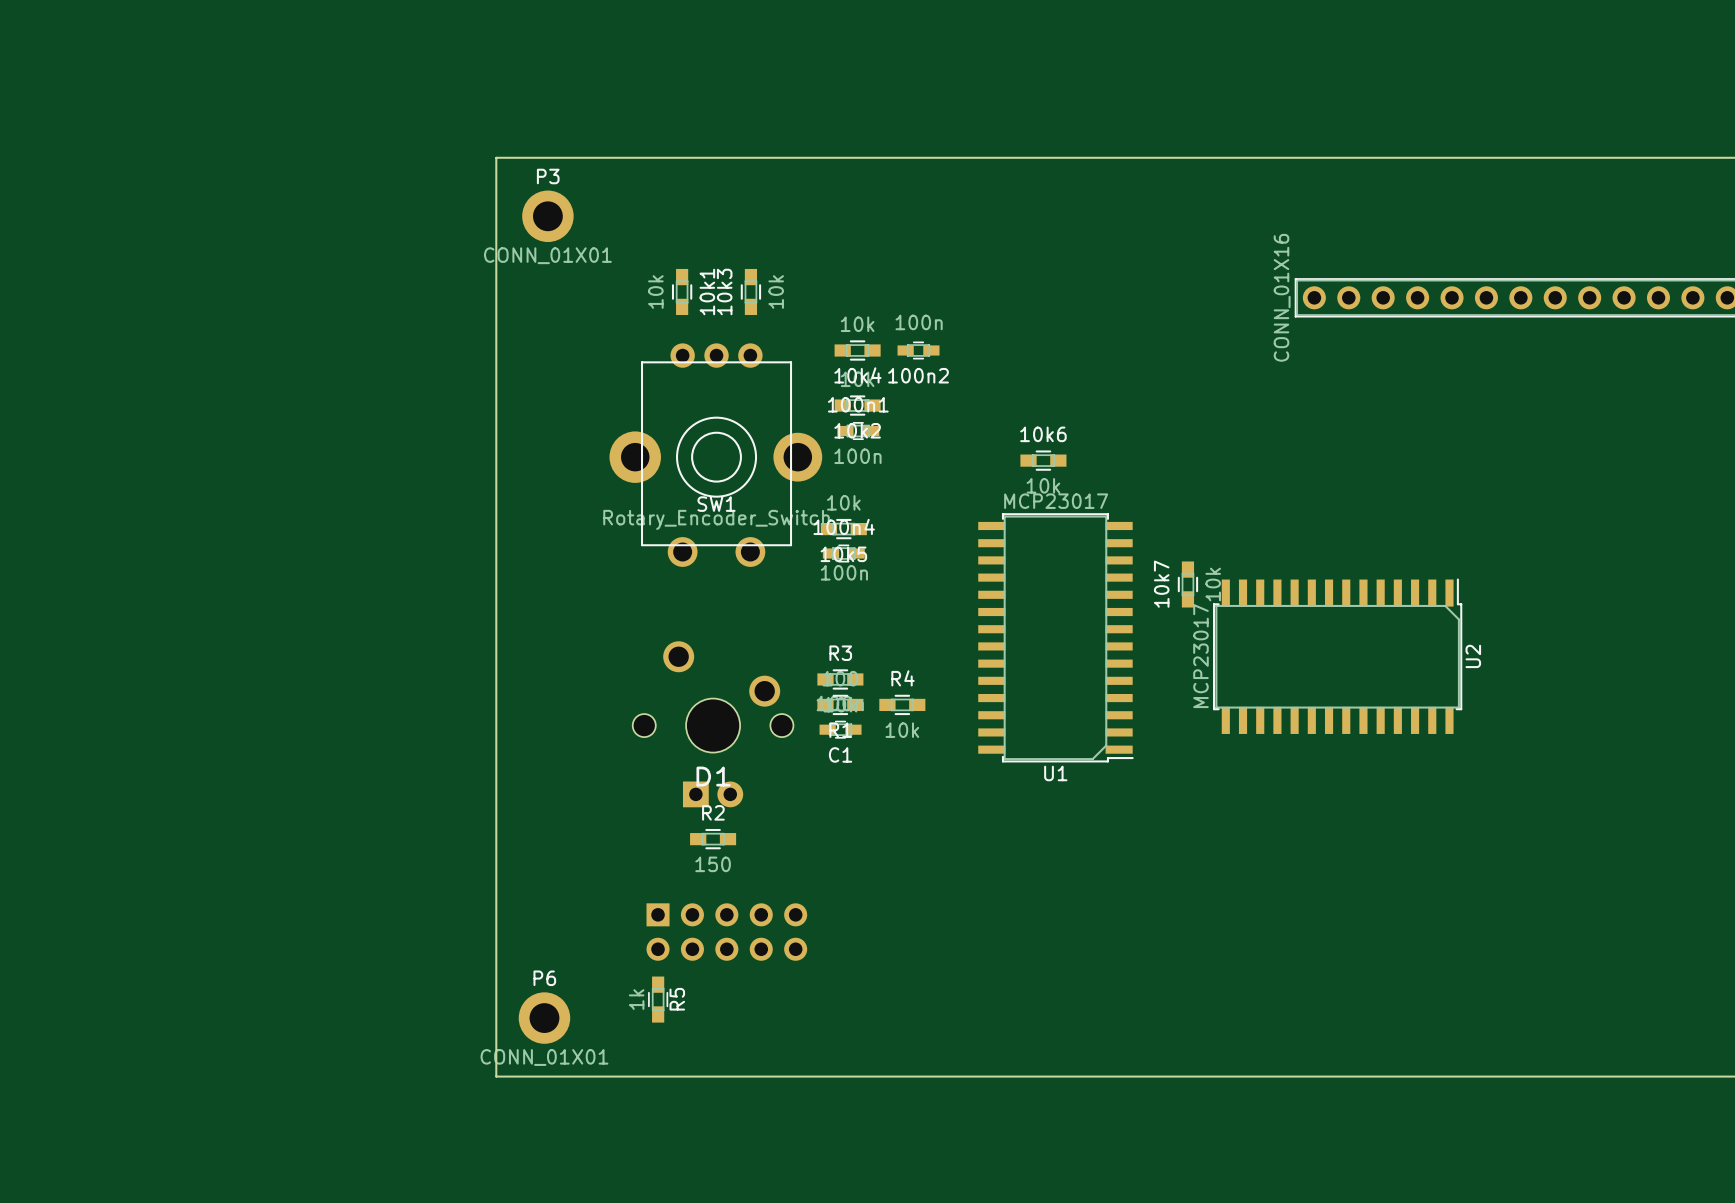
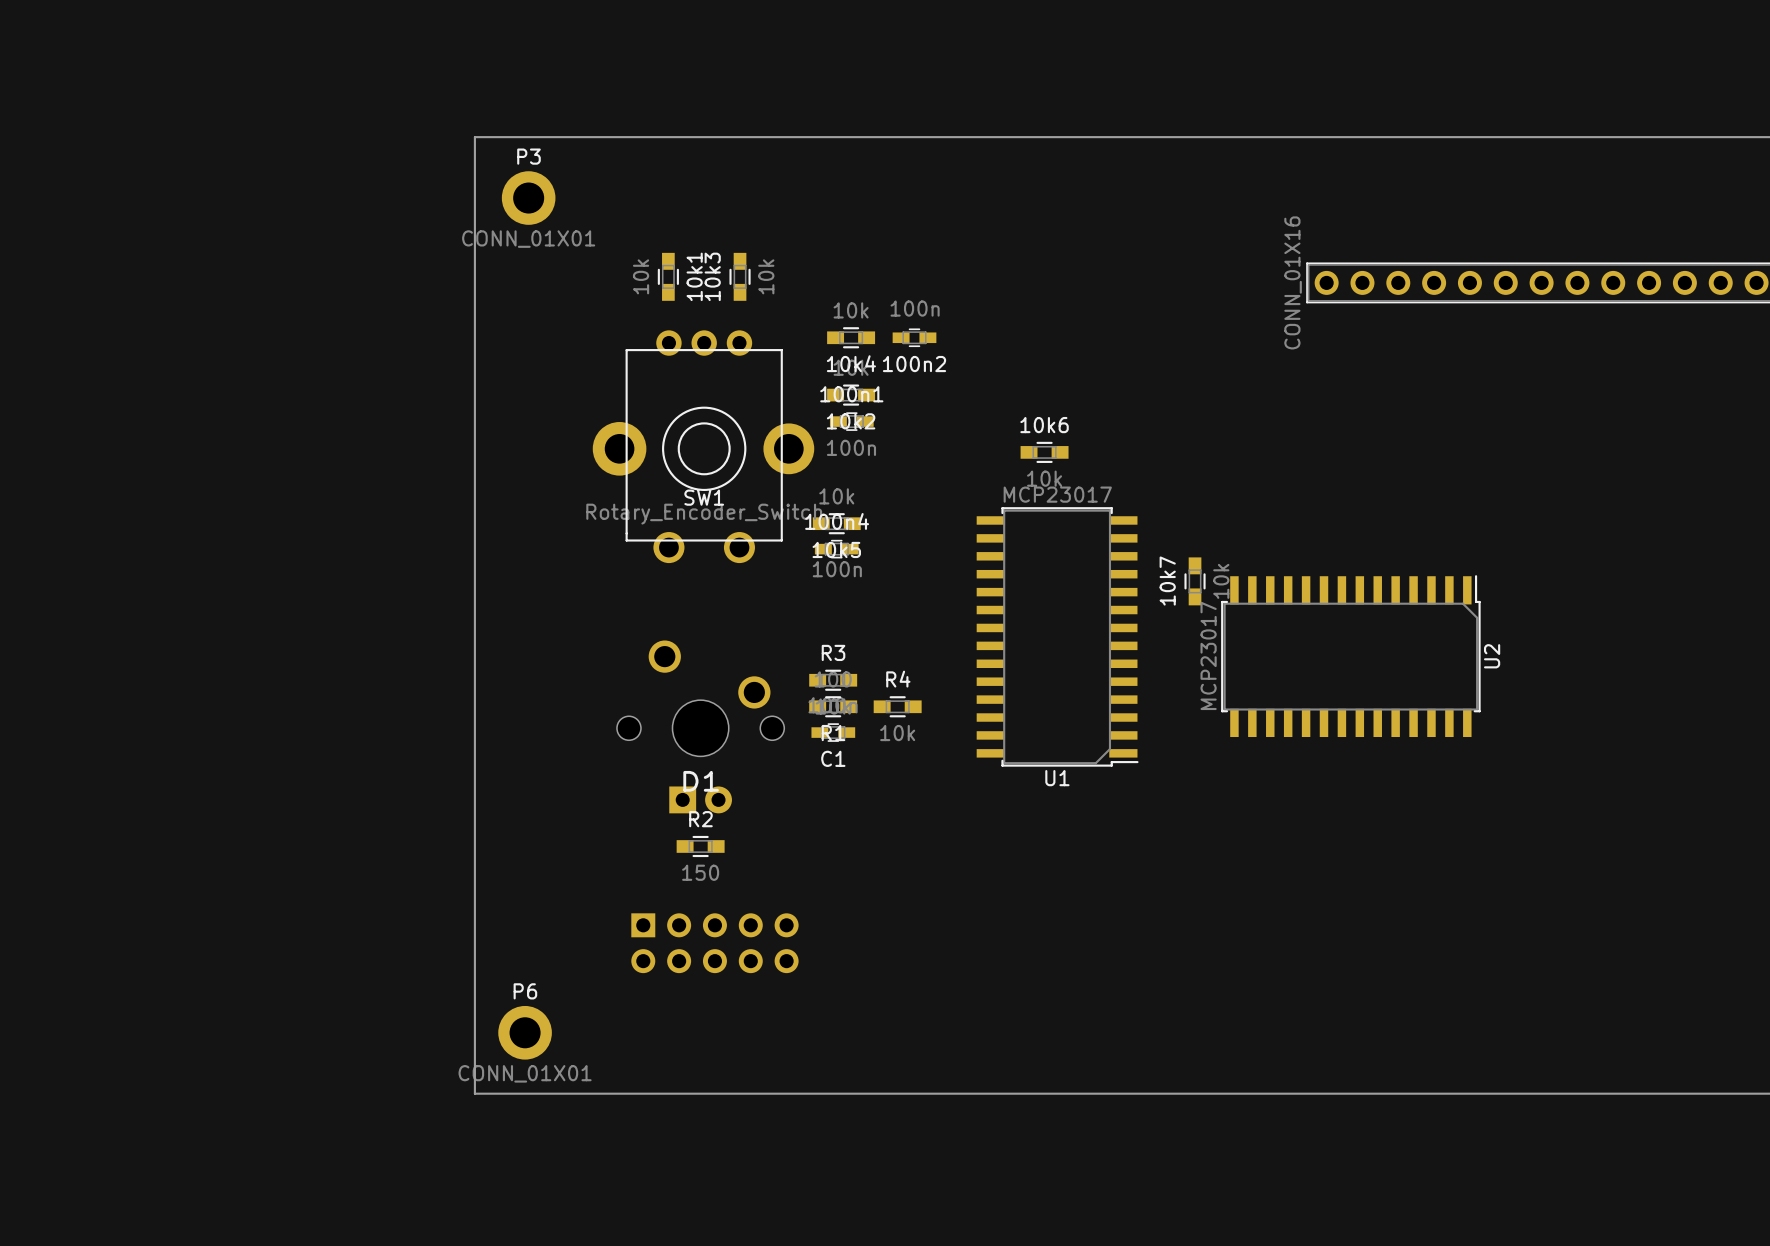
R5: 1k (658, 999) -> none

